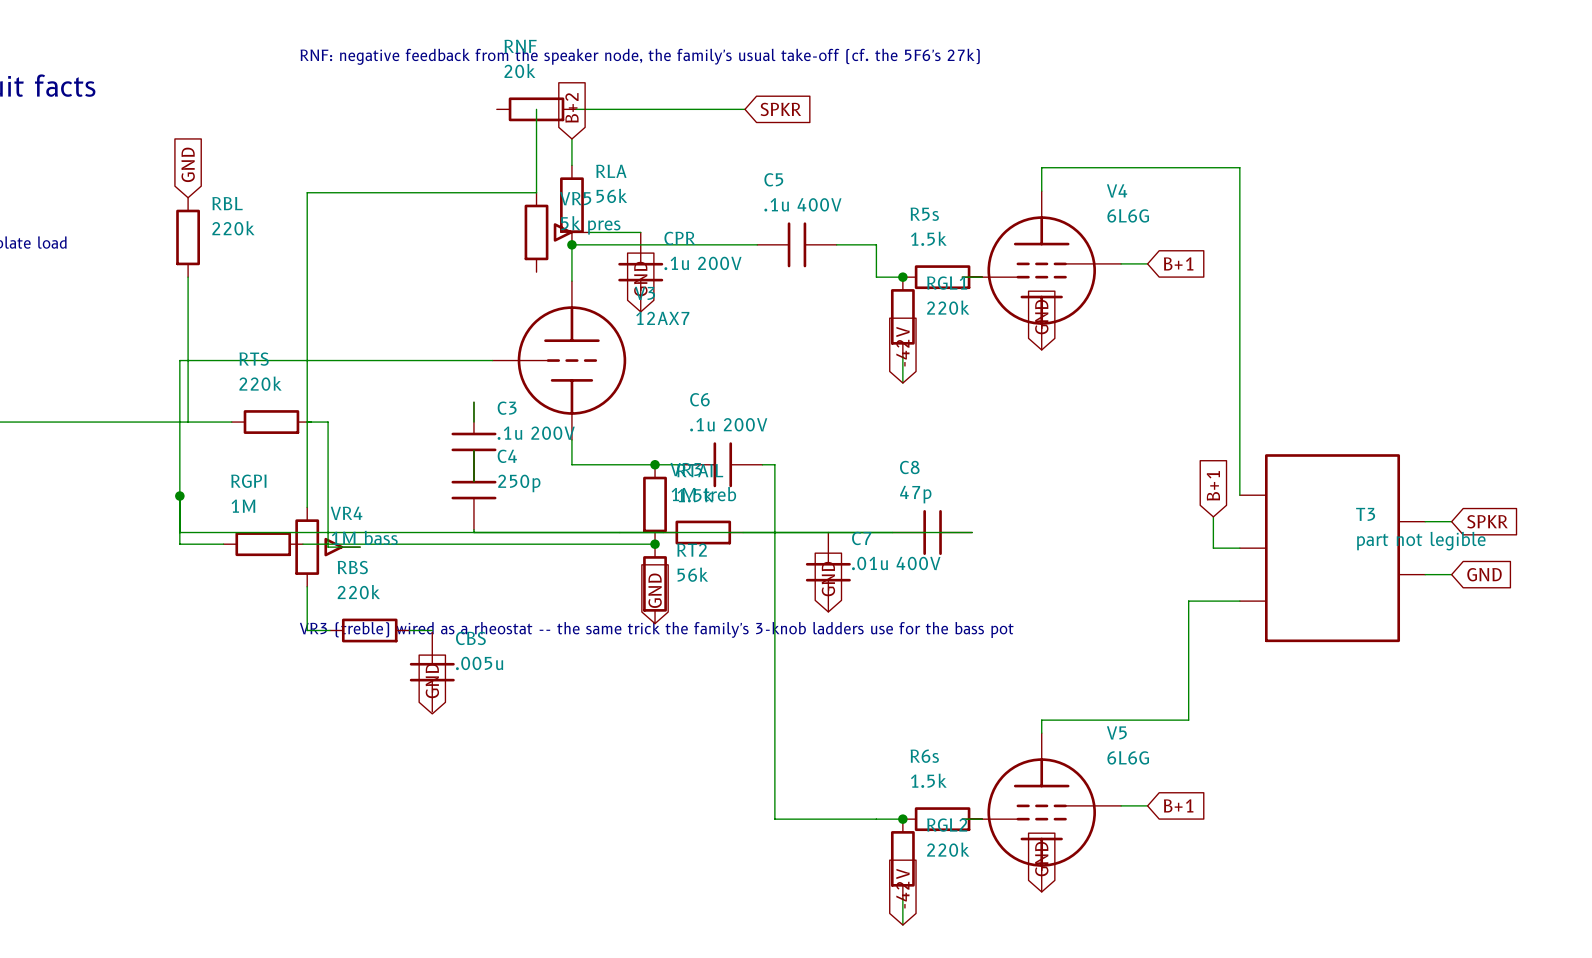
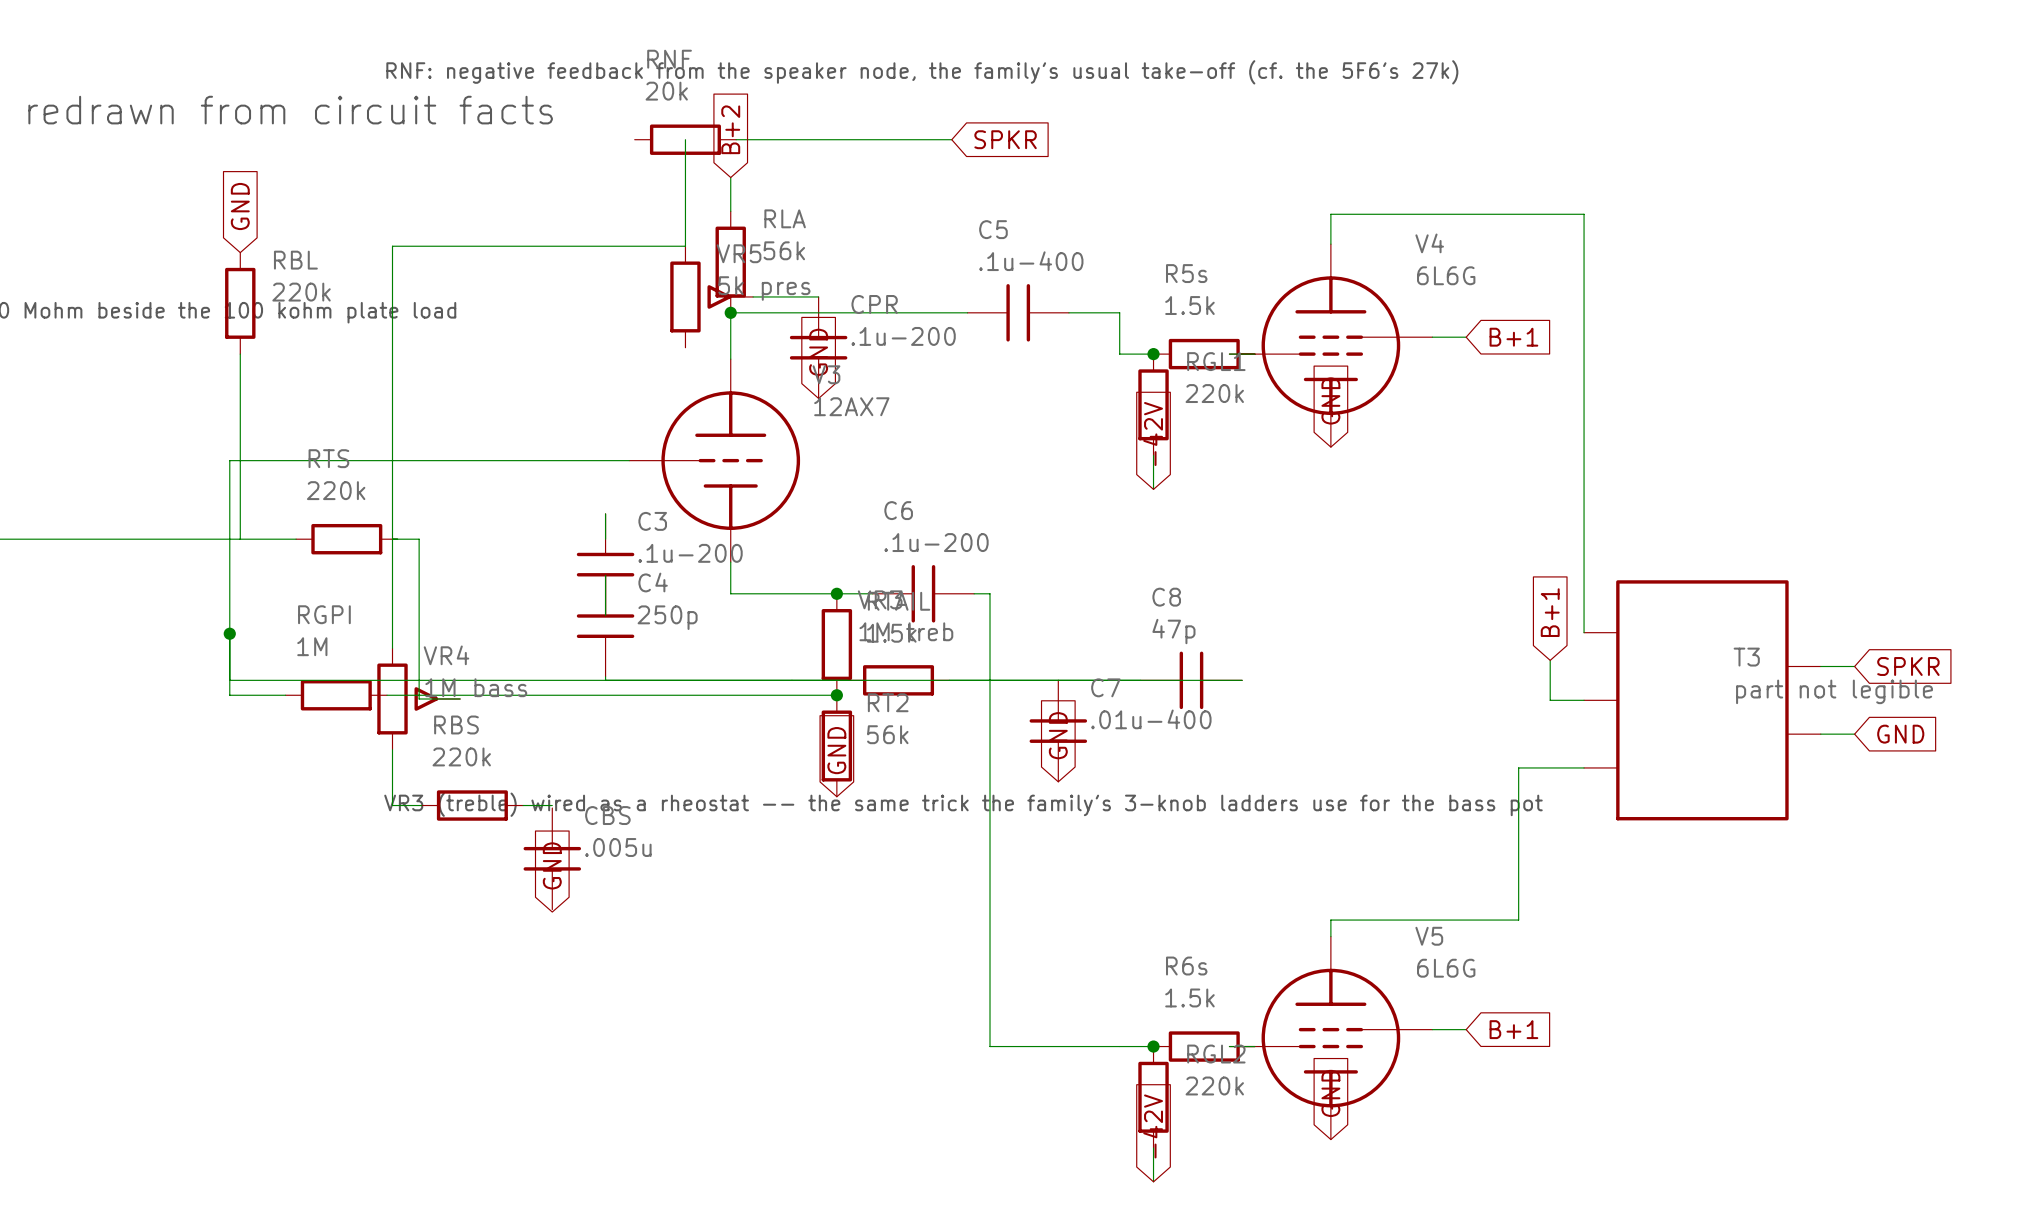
C5 value: .1u 400V (802, 204) -> .1u-400 (1031, 261)
CPR value: .1u 200V (702, 263) -> .1u-200 (903, 336)
C6 value: .1u 200V (728, 424) -> .1u-200 (936, 542)
C3 value: .1u 200V (536, 433) -> .1u-200 (690, 553)
C7 value: .01u 400V (896, 563) -> .01u-400 (1151, 719)

